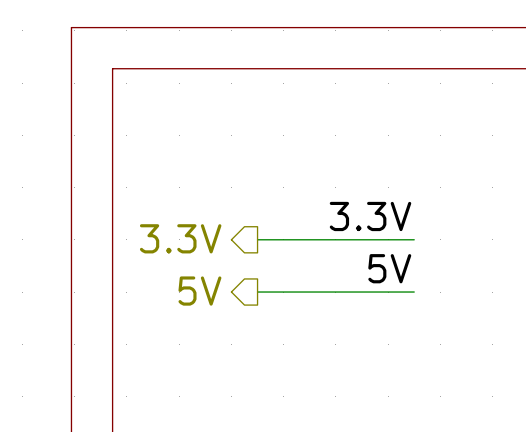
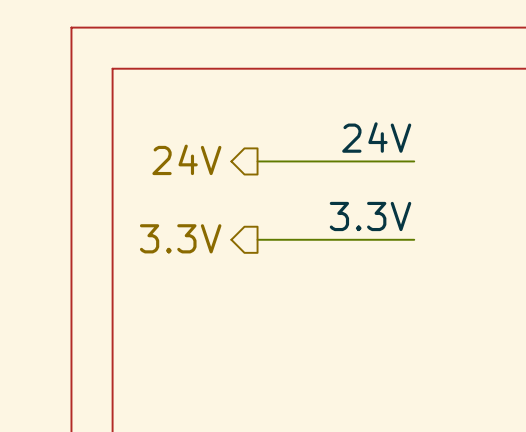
label: none -> 24V (376, 137)
hierarchical label: none -> 24V (186, 159)
label: 5V (389, 268) -> none
hierarchical label: 5V (199, 291) -> none
wire: (257, 292) (414, 292) -> (257, 161) (414, 161)

